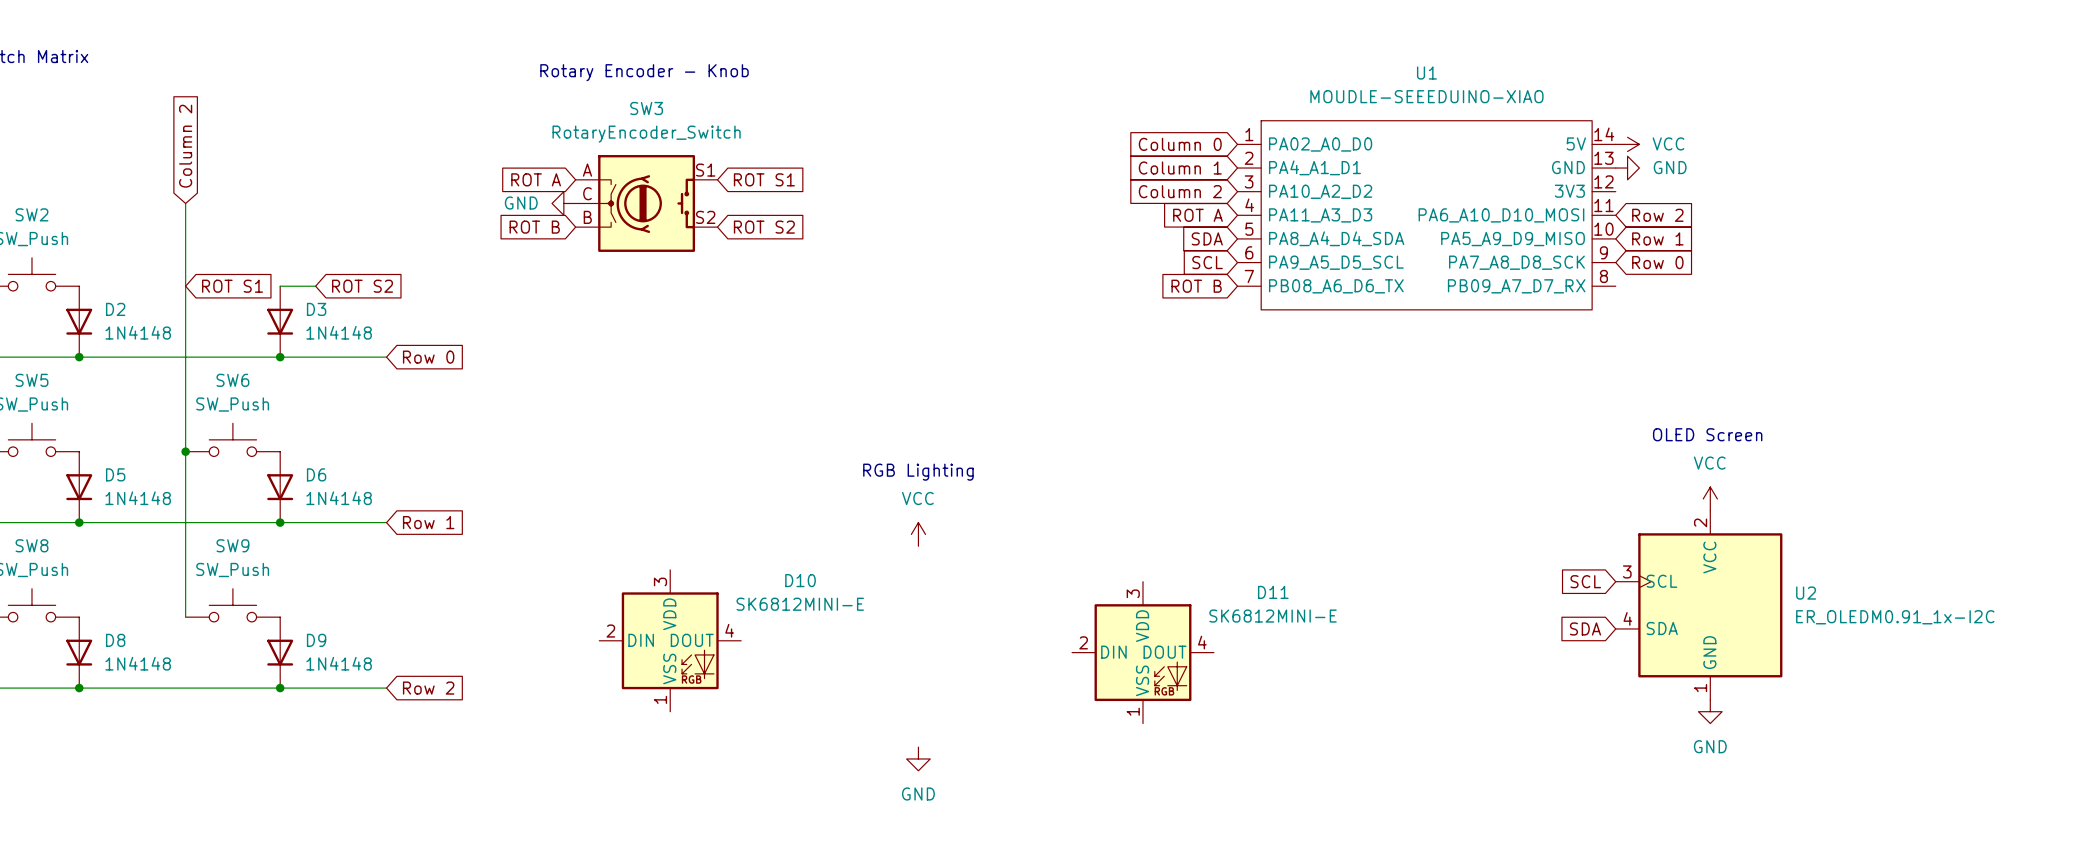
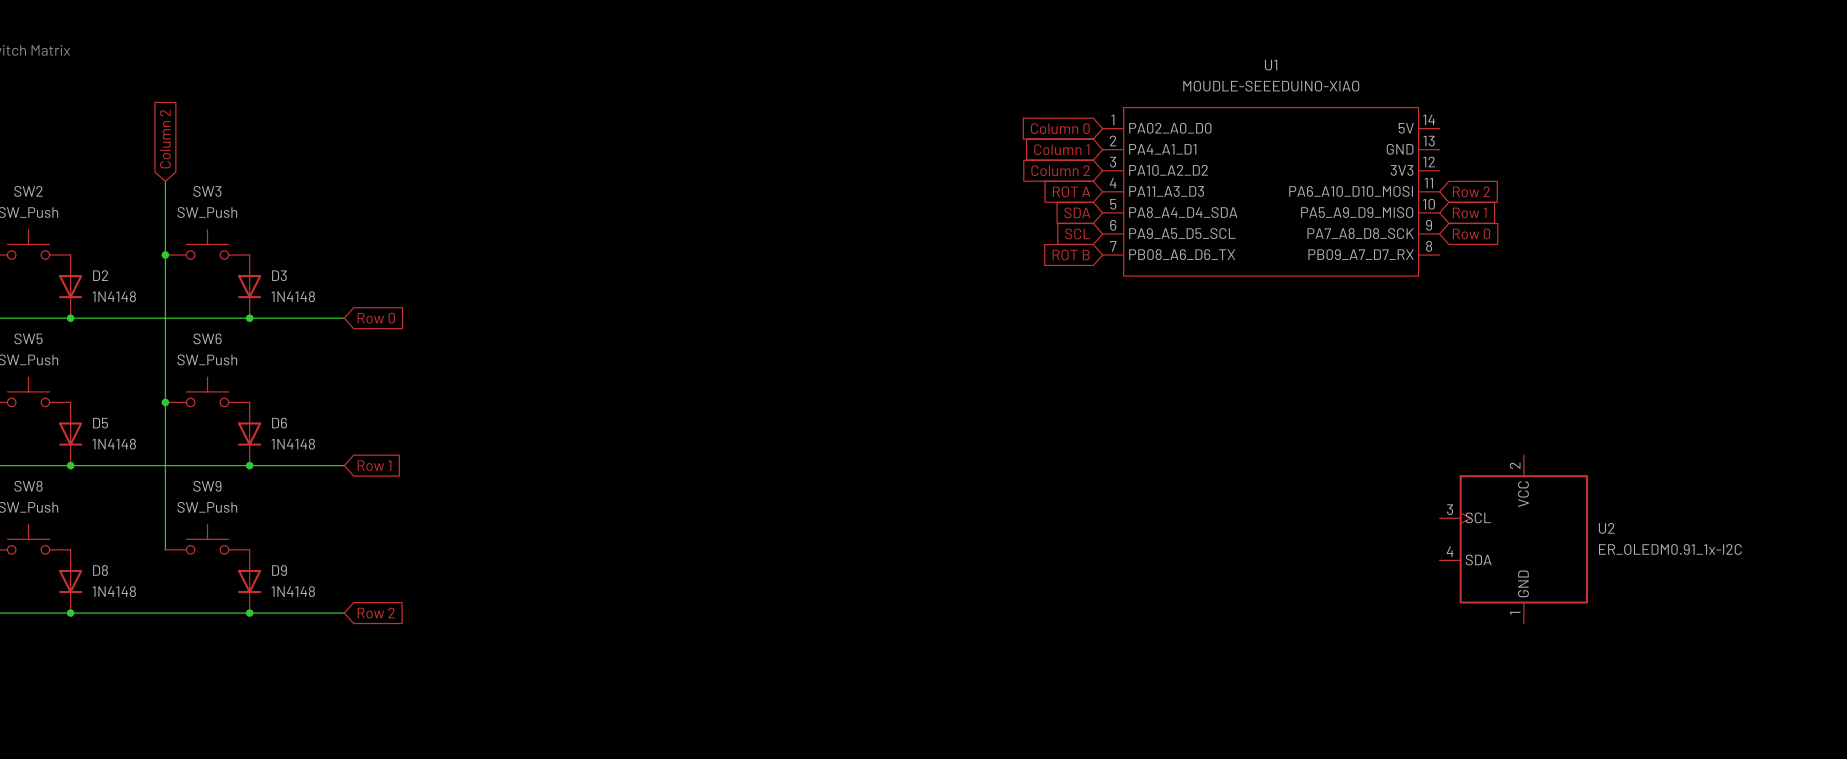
text: Rotary Encoder - Knob (644, 72) -> none
SW3 name position: SW3 (646, 108) -> SW3 (207, 191)
SW3 value: RotaryEncoder_Switch (646, 134) -> SW_Push (207, 212)
power symbol: VCC (1627, 144) -> none
SW3 symbol: [575, 155, 718, 252] -> [165, 229, 250, 260]
power symbol: GND (1627, 168) -> none
global label: ROT A (536, 179) -> none
global label: ROT S1 (764, 179) -> none
power symbol: GND (563, 203) -> none
global label: ROT B (534, 227) -> none
global label: ROT S2 (764, 227) -> none
junction: none -> (165, 255)
global label: ROT S1 (232, 286) -> none
wire: (280, 286) (315, 286) -> none
global label: ROT S2 (362, 286) -> none
text: OLED Screen (1707, 434) -> none
text: RGB Lighting (918, 472) -> none
power symbol: VCC (1710, 498) -> none
power symbol: VCC (918, 534) -> none
global label: SCL (1585, 581) -> none
global label: SDA (1585, 628) -> none
D10: SK6812MINI-E (670, 640) -> none
D11: SK6812MINI-E (1142, 652) -> none
power symbol: GND (1710, 711) -> none
power symbol: GND (918, 758) -> none

